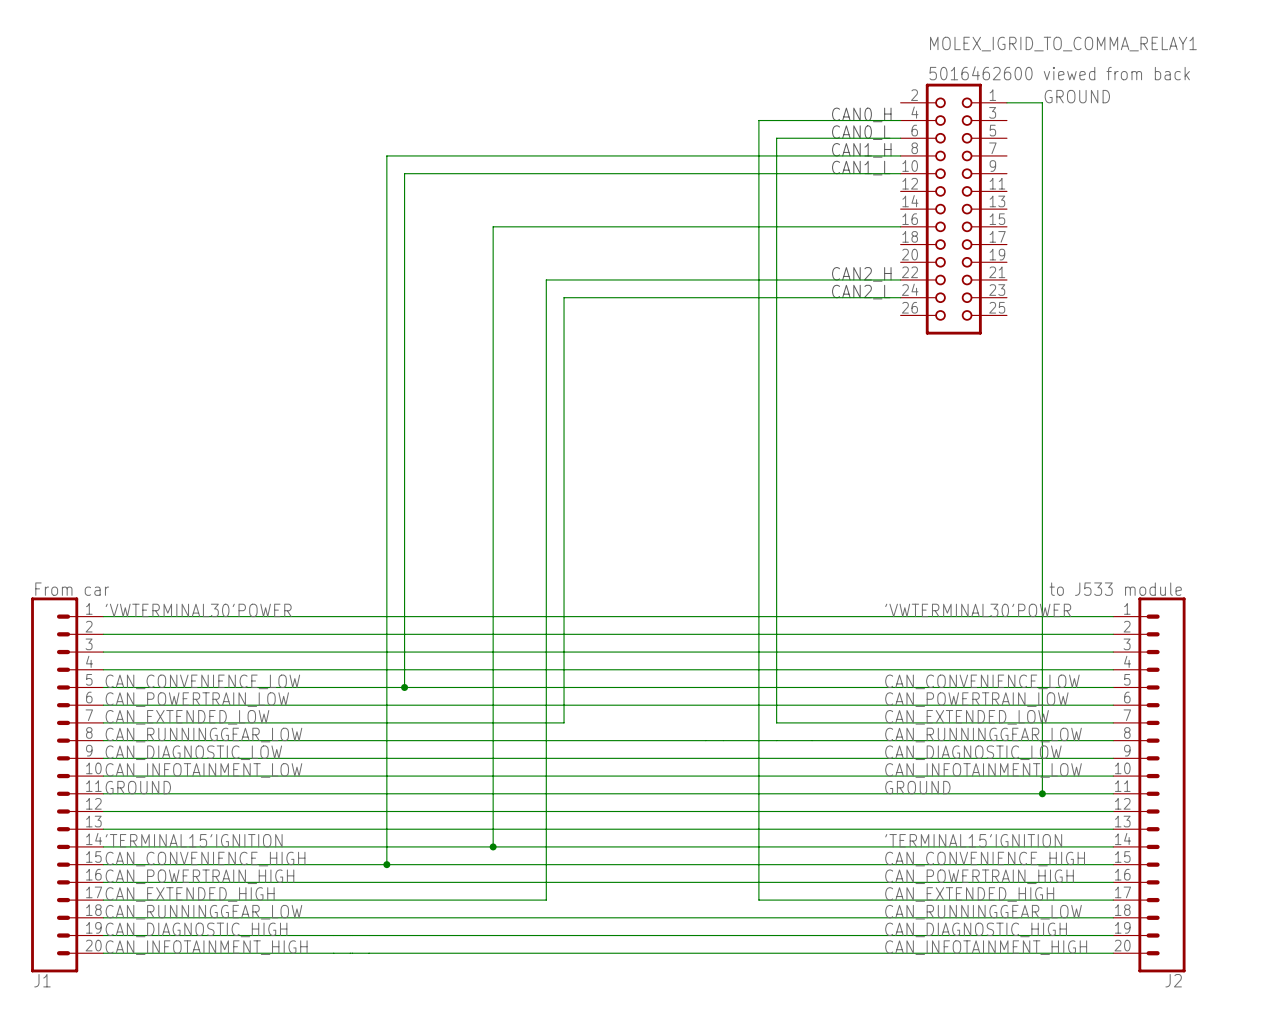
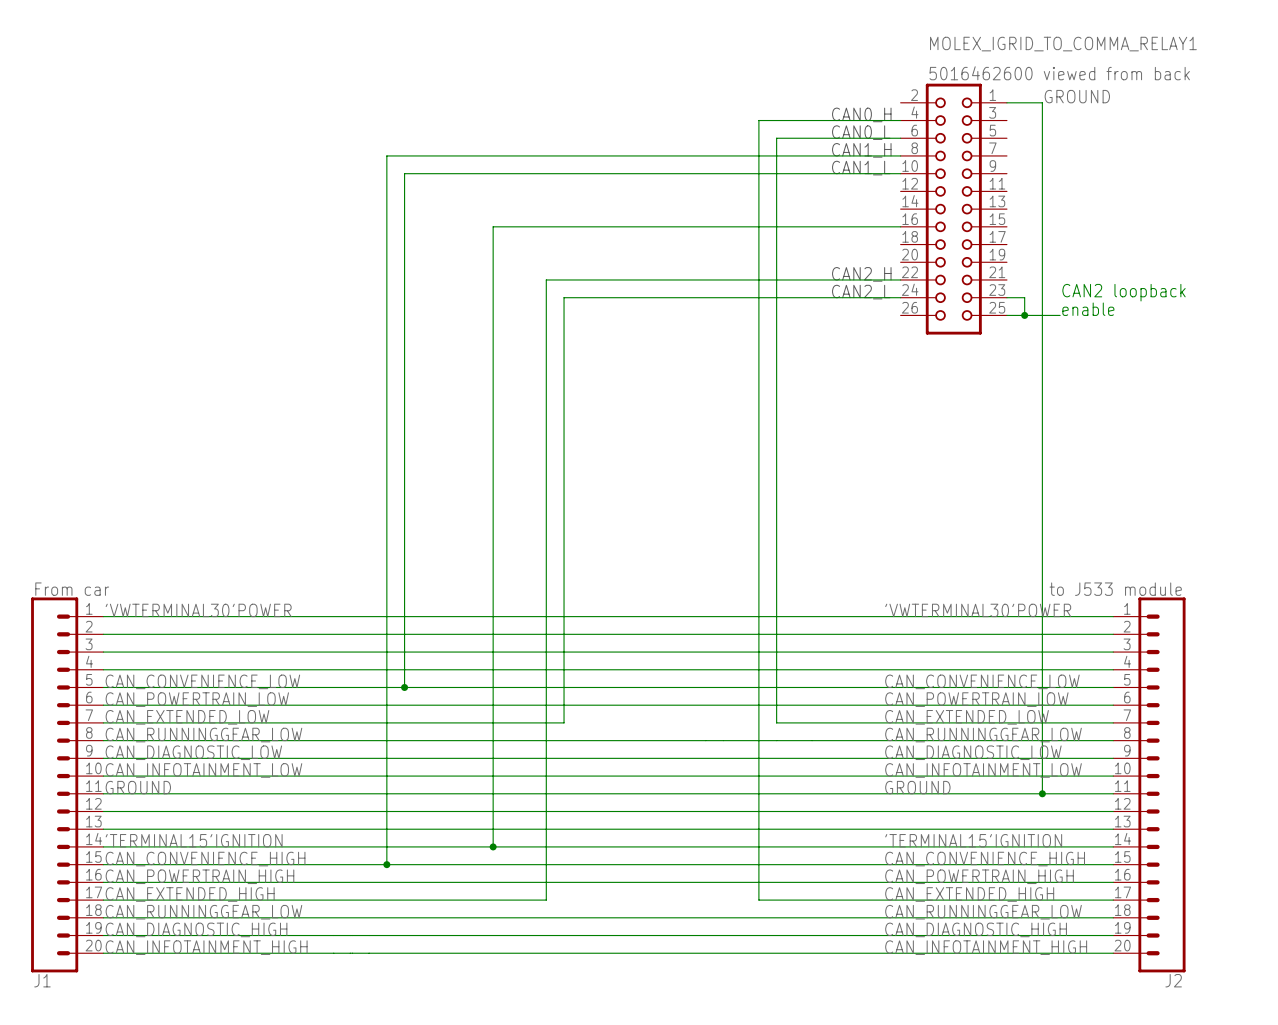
text: none -> CAN2 loopback (1124, 292)
wire: none -> (1006, 297) (1024, 297) (1024, 315)
text: none -> enable (1088, 309)
wire: none -> (1006, 315) (1060, 315)
junction: none -> (1024, 315)

